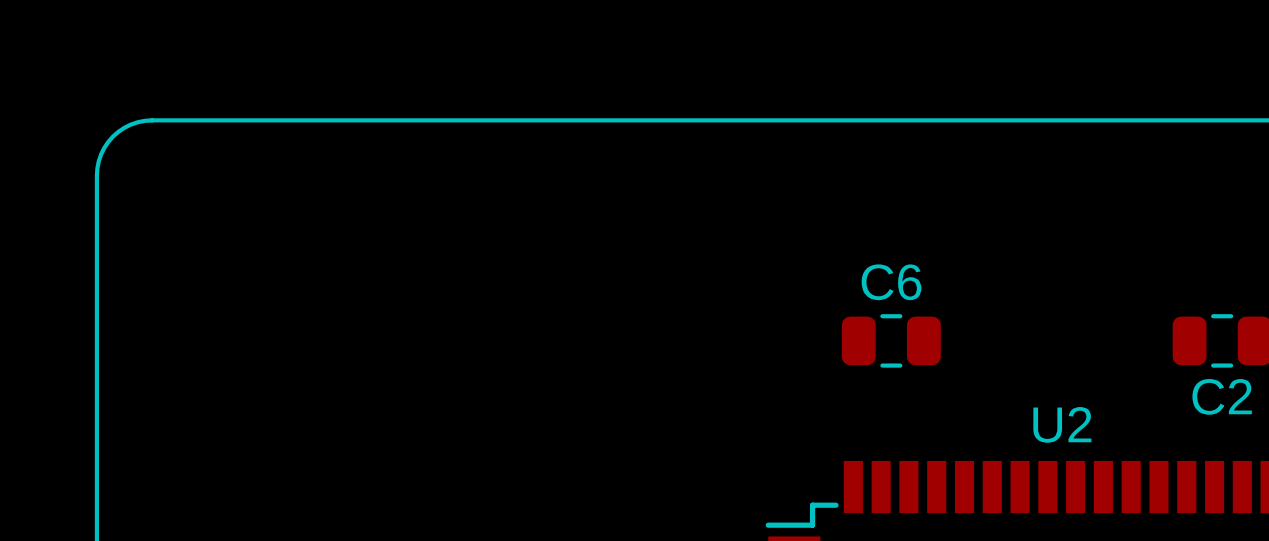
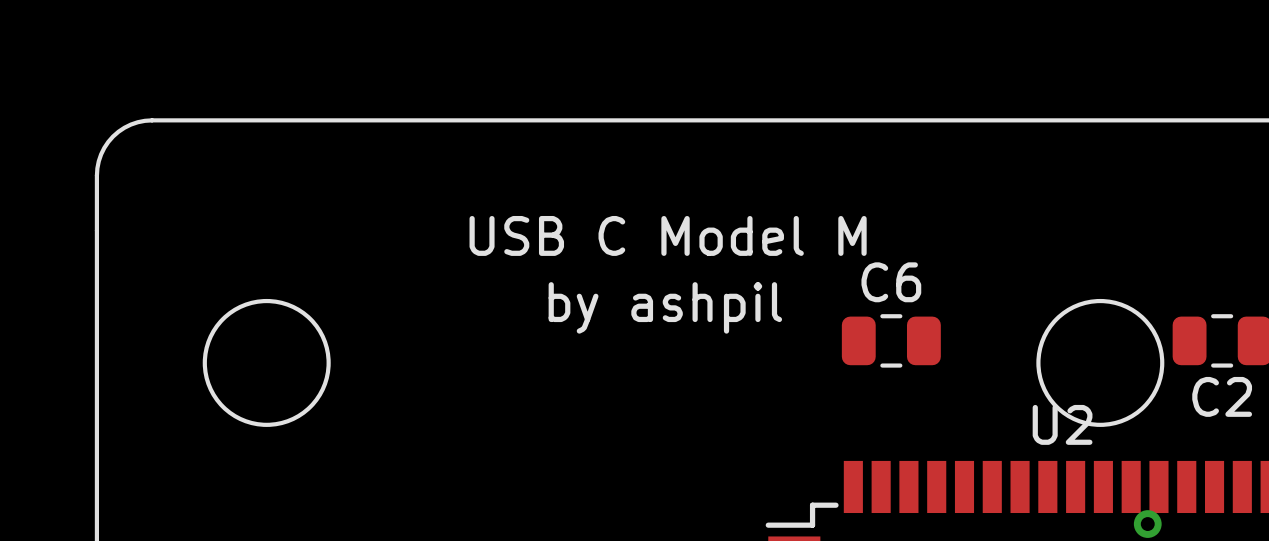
text: none -> USB C Model M (668, 235)
drawing: none -> [202, 298, 331, 427]
drawing: none -> [1036, 298, 1165, 427]
text: none -> by ashpil (665, 307)
via: none -> (1147, 524)

